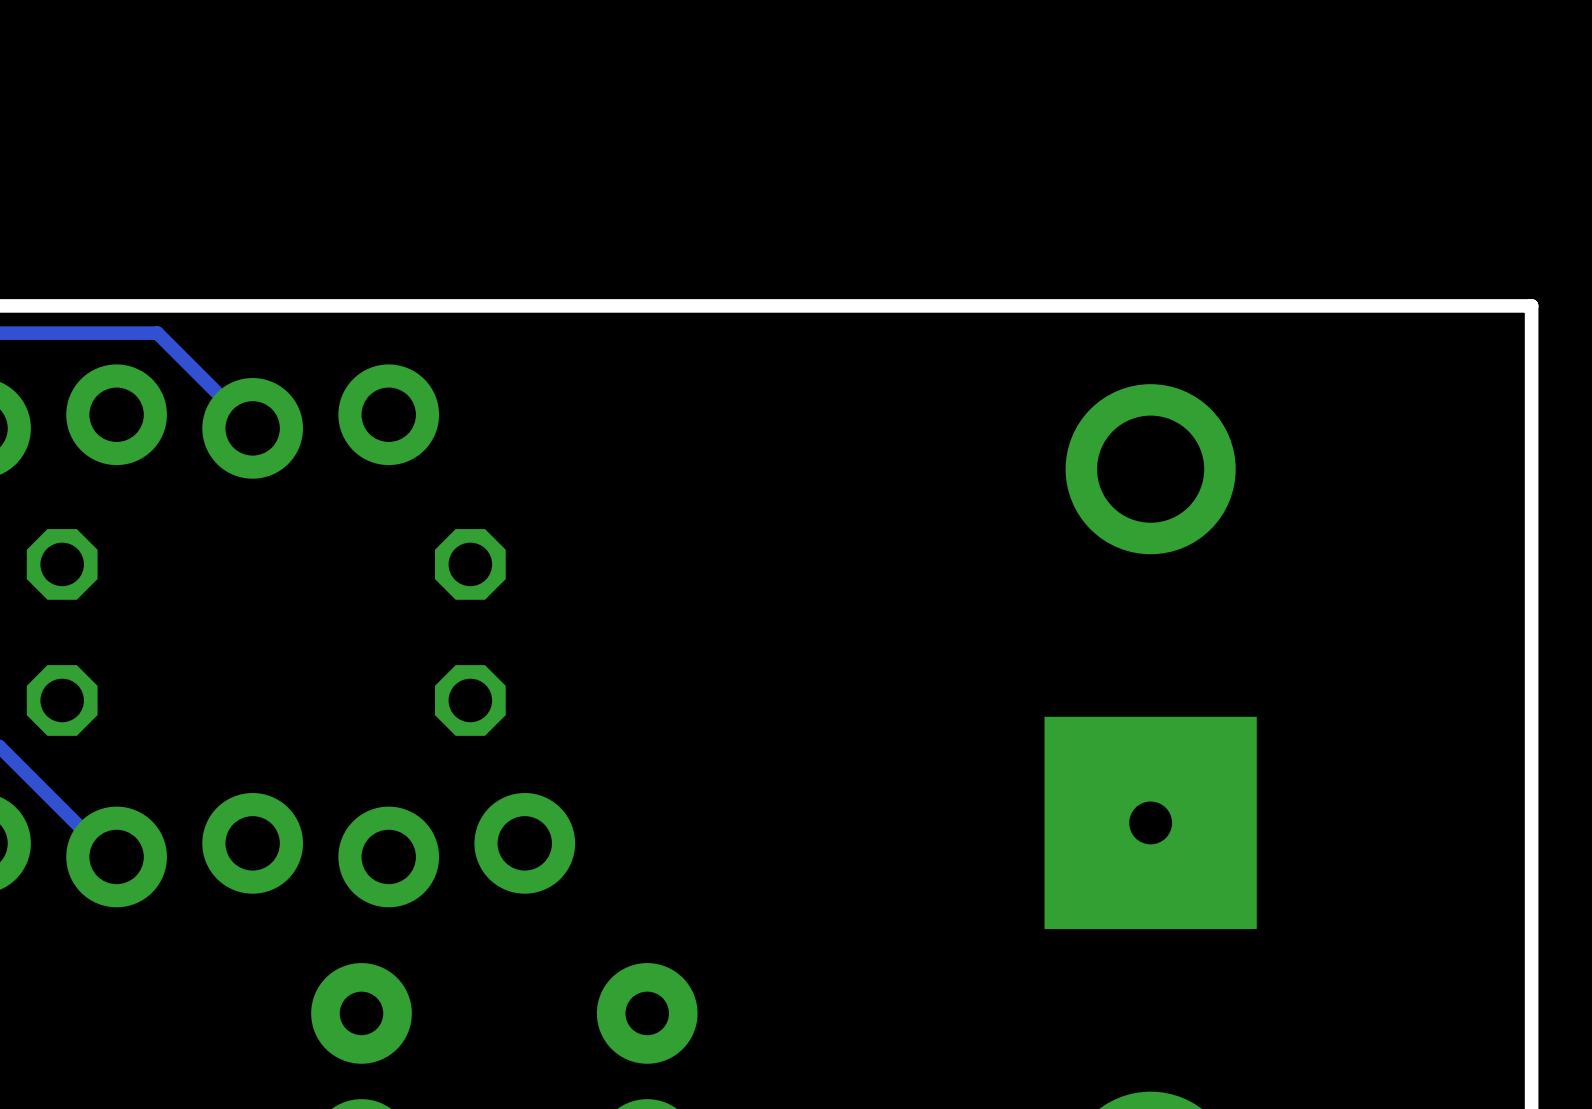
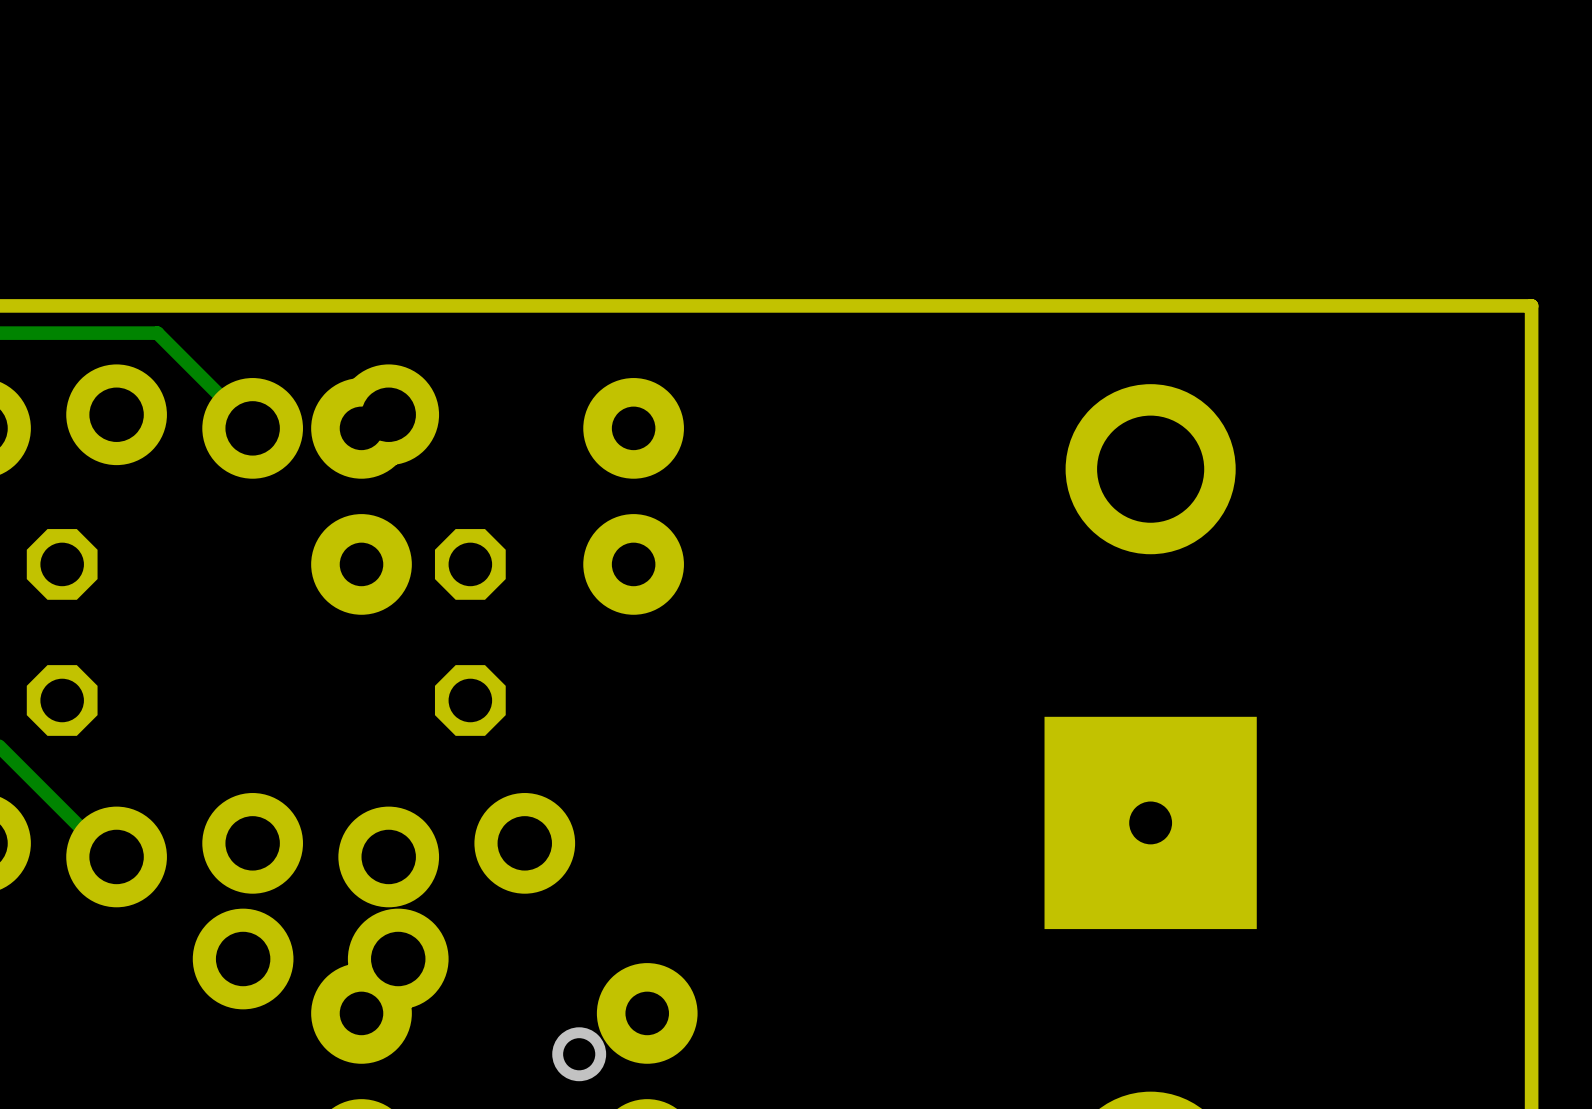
part: none -> (361, 496)
part: none -> (633, 496)
part: none -> (320, 959)
via: none -> (579, 1054)

